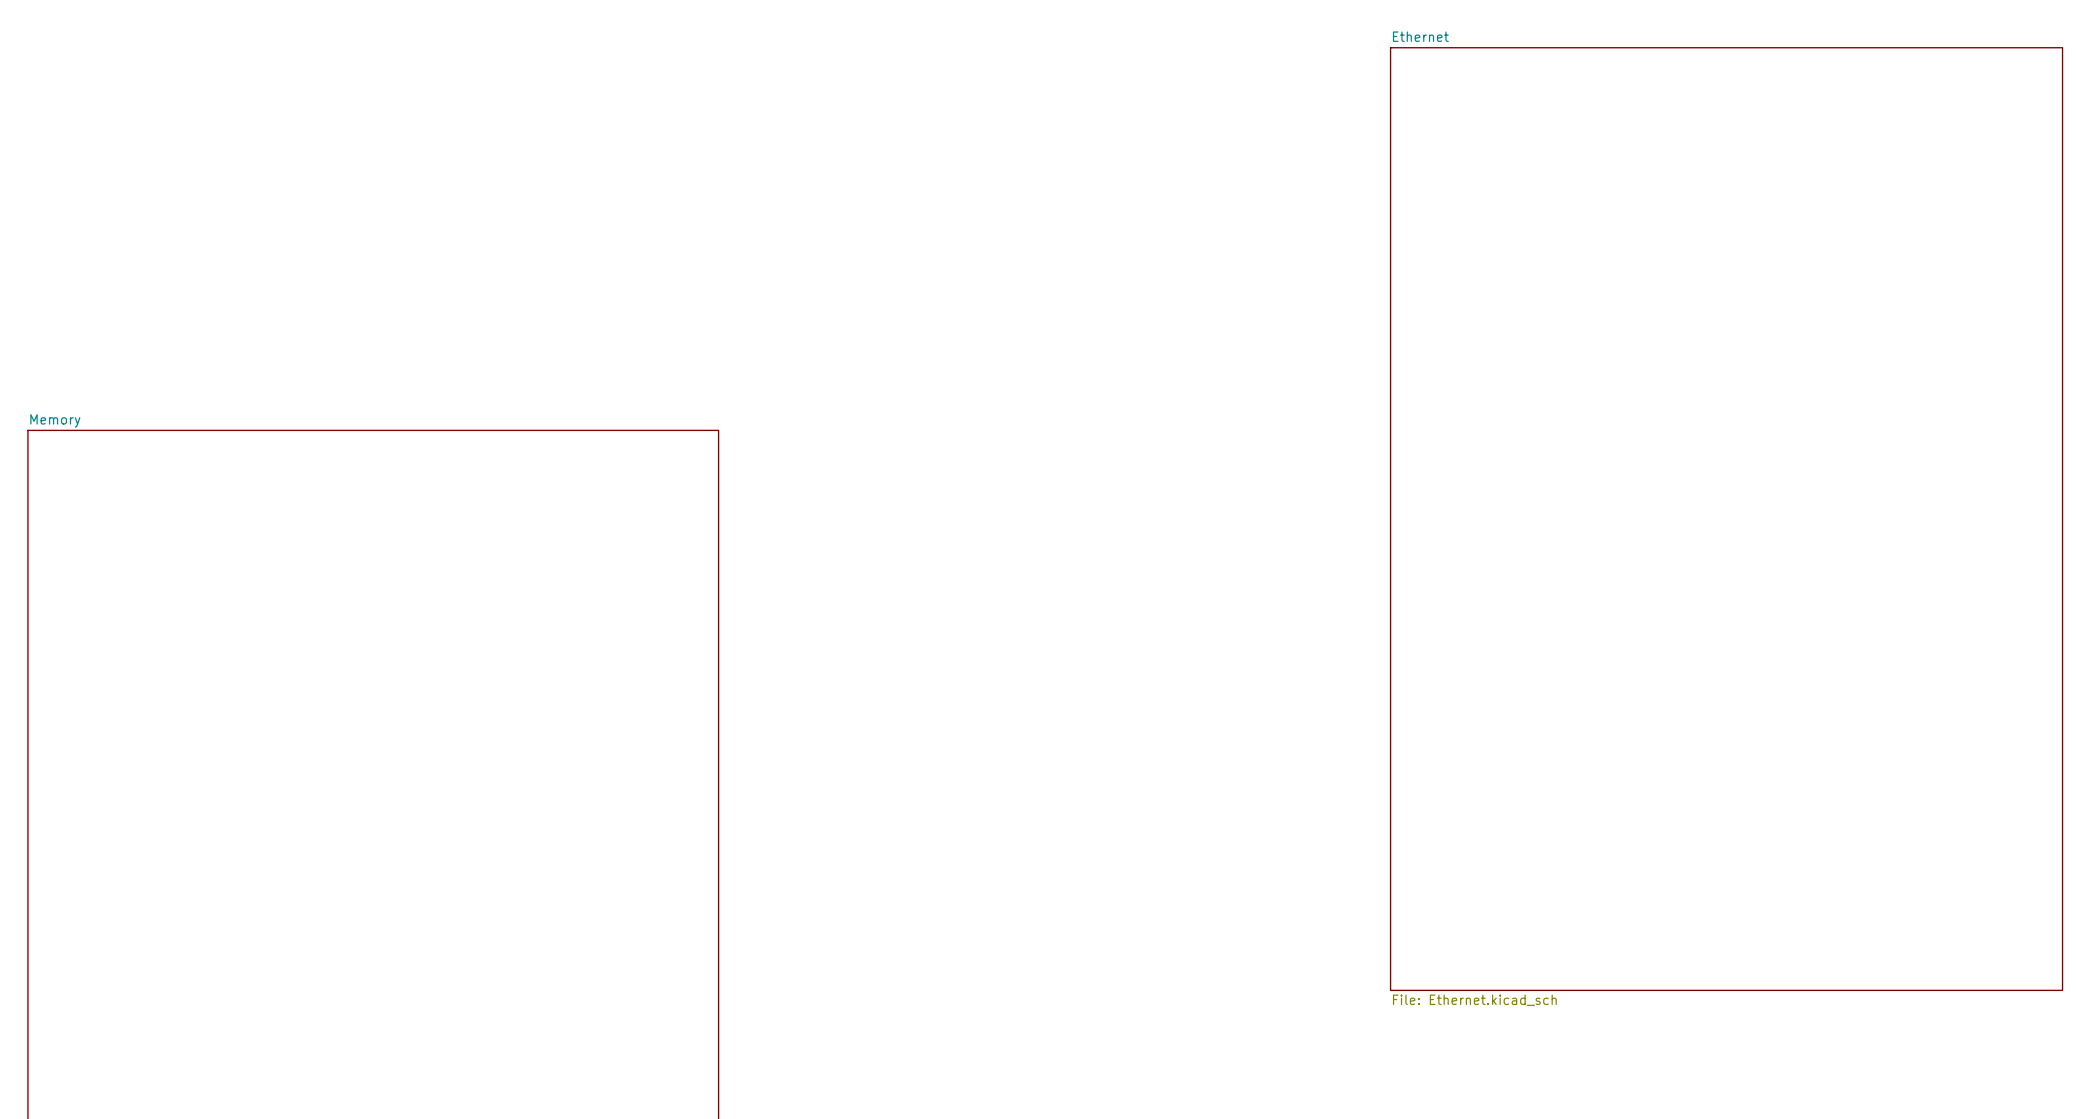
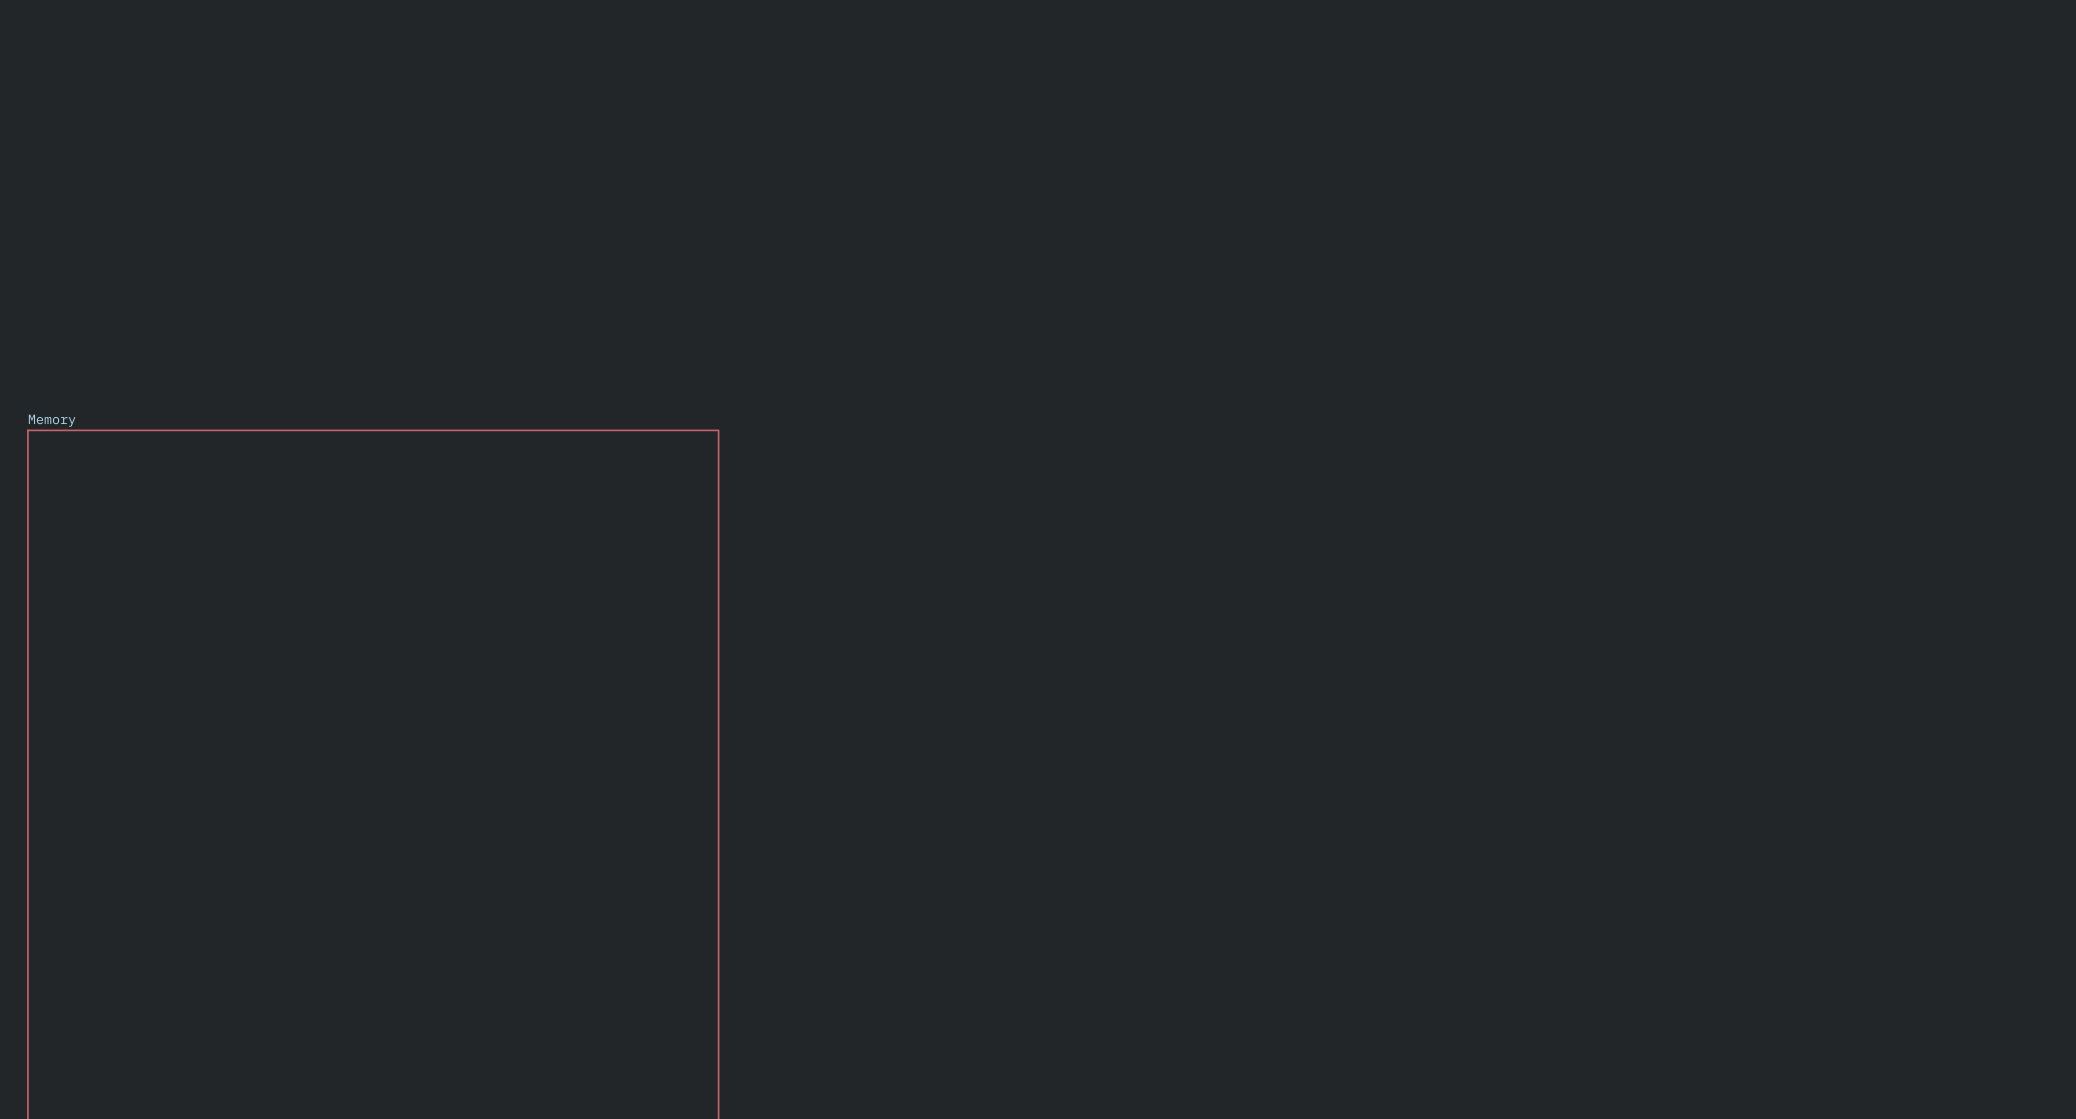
sheet Ethernet: File: Ethernet.kicad_sch (1726, 519) -> none

